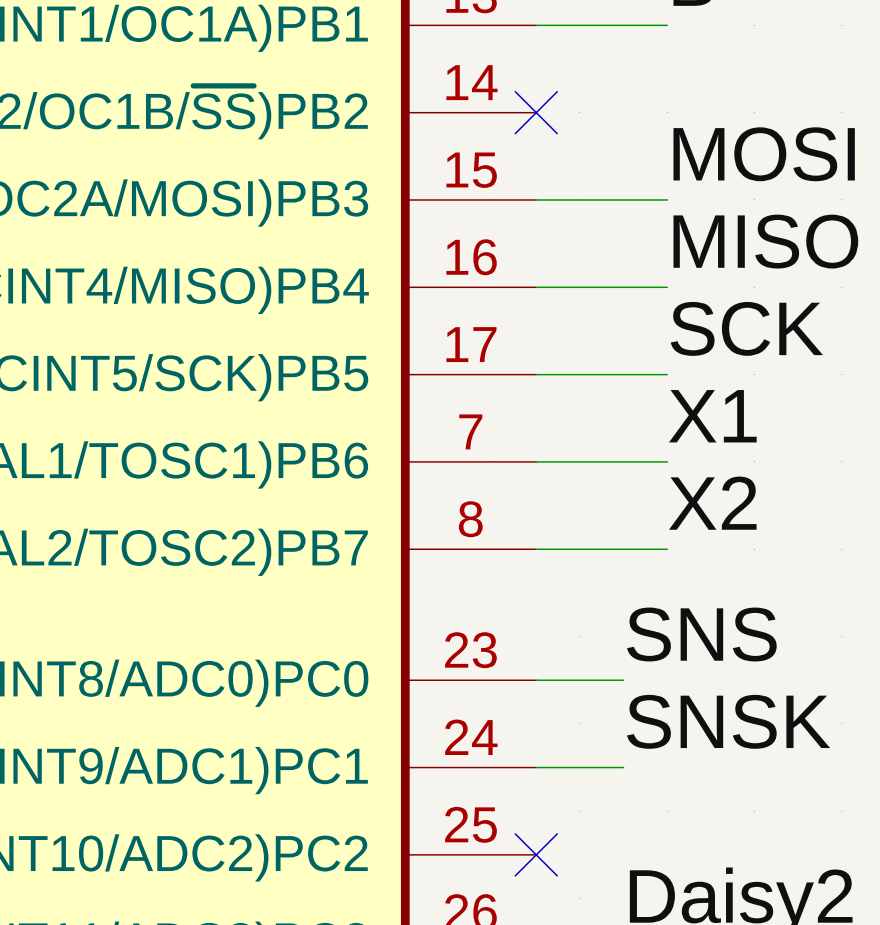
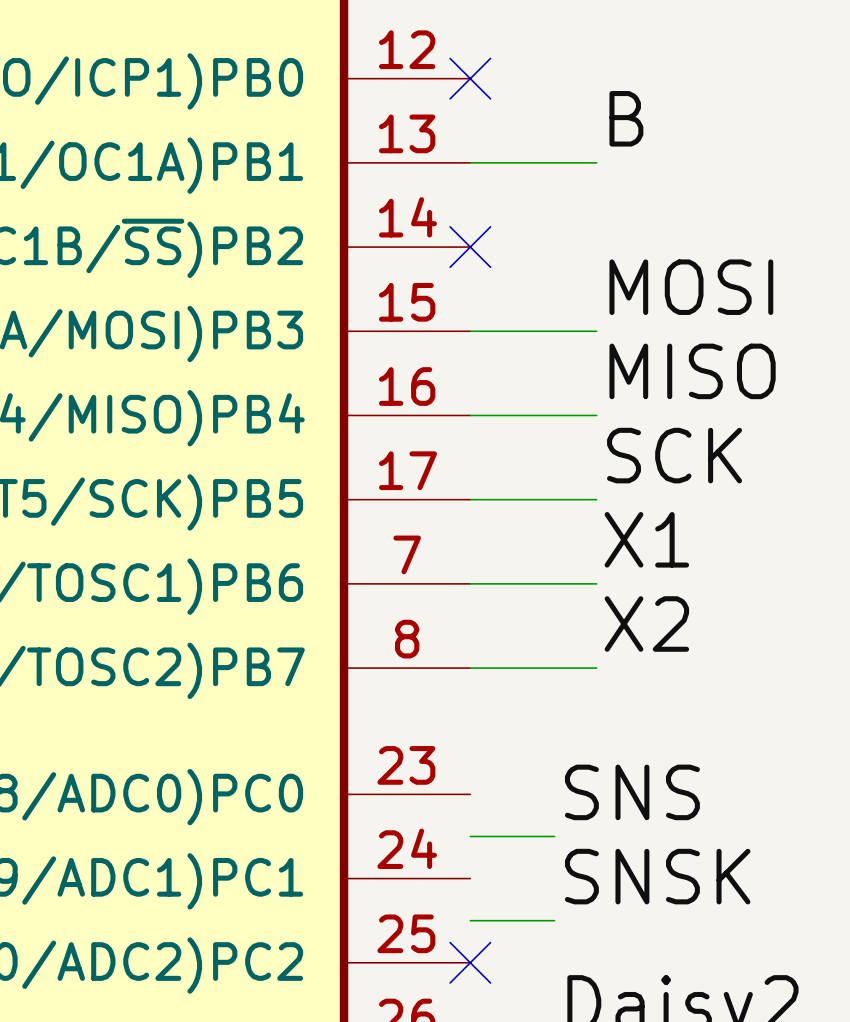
label position: SNS (701, 634) -> SNS (632, 792)
wire: (536, 680) (623, 680) -> (470, 836) (554, 836)
label position: SNSK (728, 721) -> SNSK (657, 876)
wire: (536, 767) (623, 767) -> (470, 920) (554, 920)

